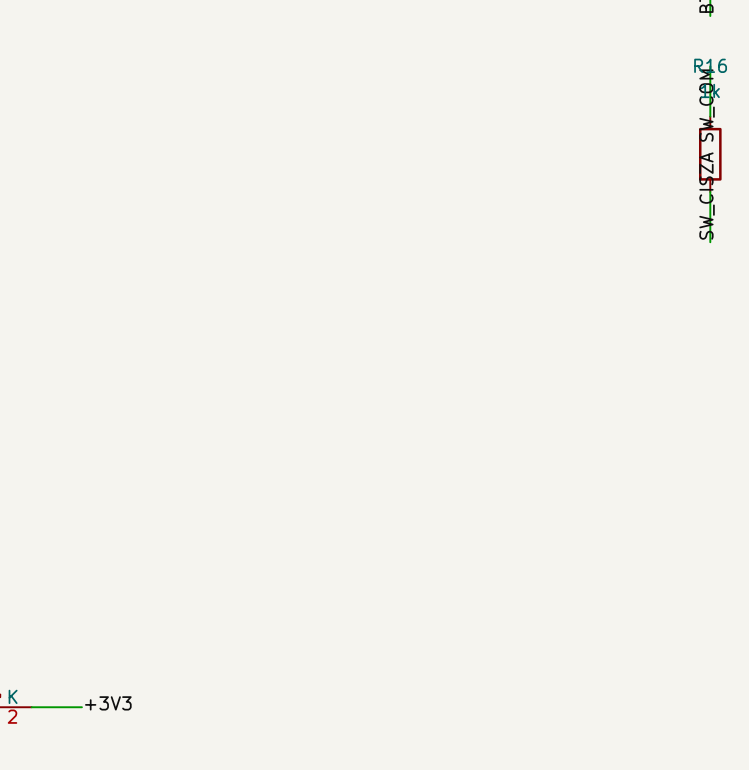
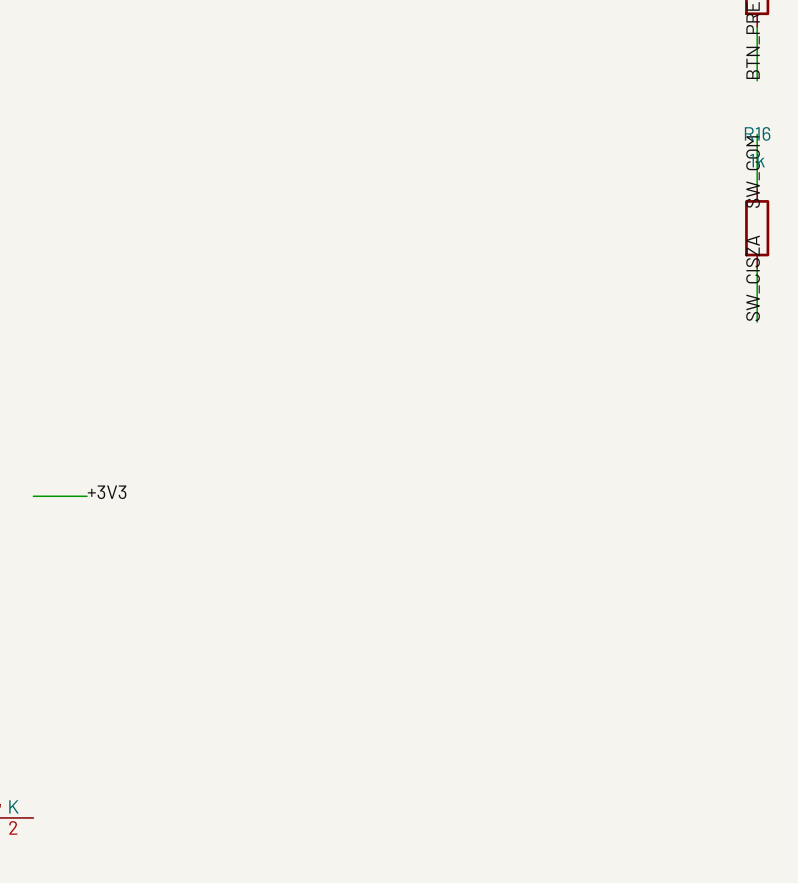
label: none -> +3V3 (107, 492)
wire: none -> (33, 496) (87, 496)
label: +3V3 (108, 703) -> none
wire: (31, 707) (81, 707) -> none

